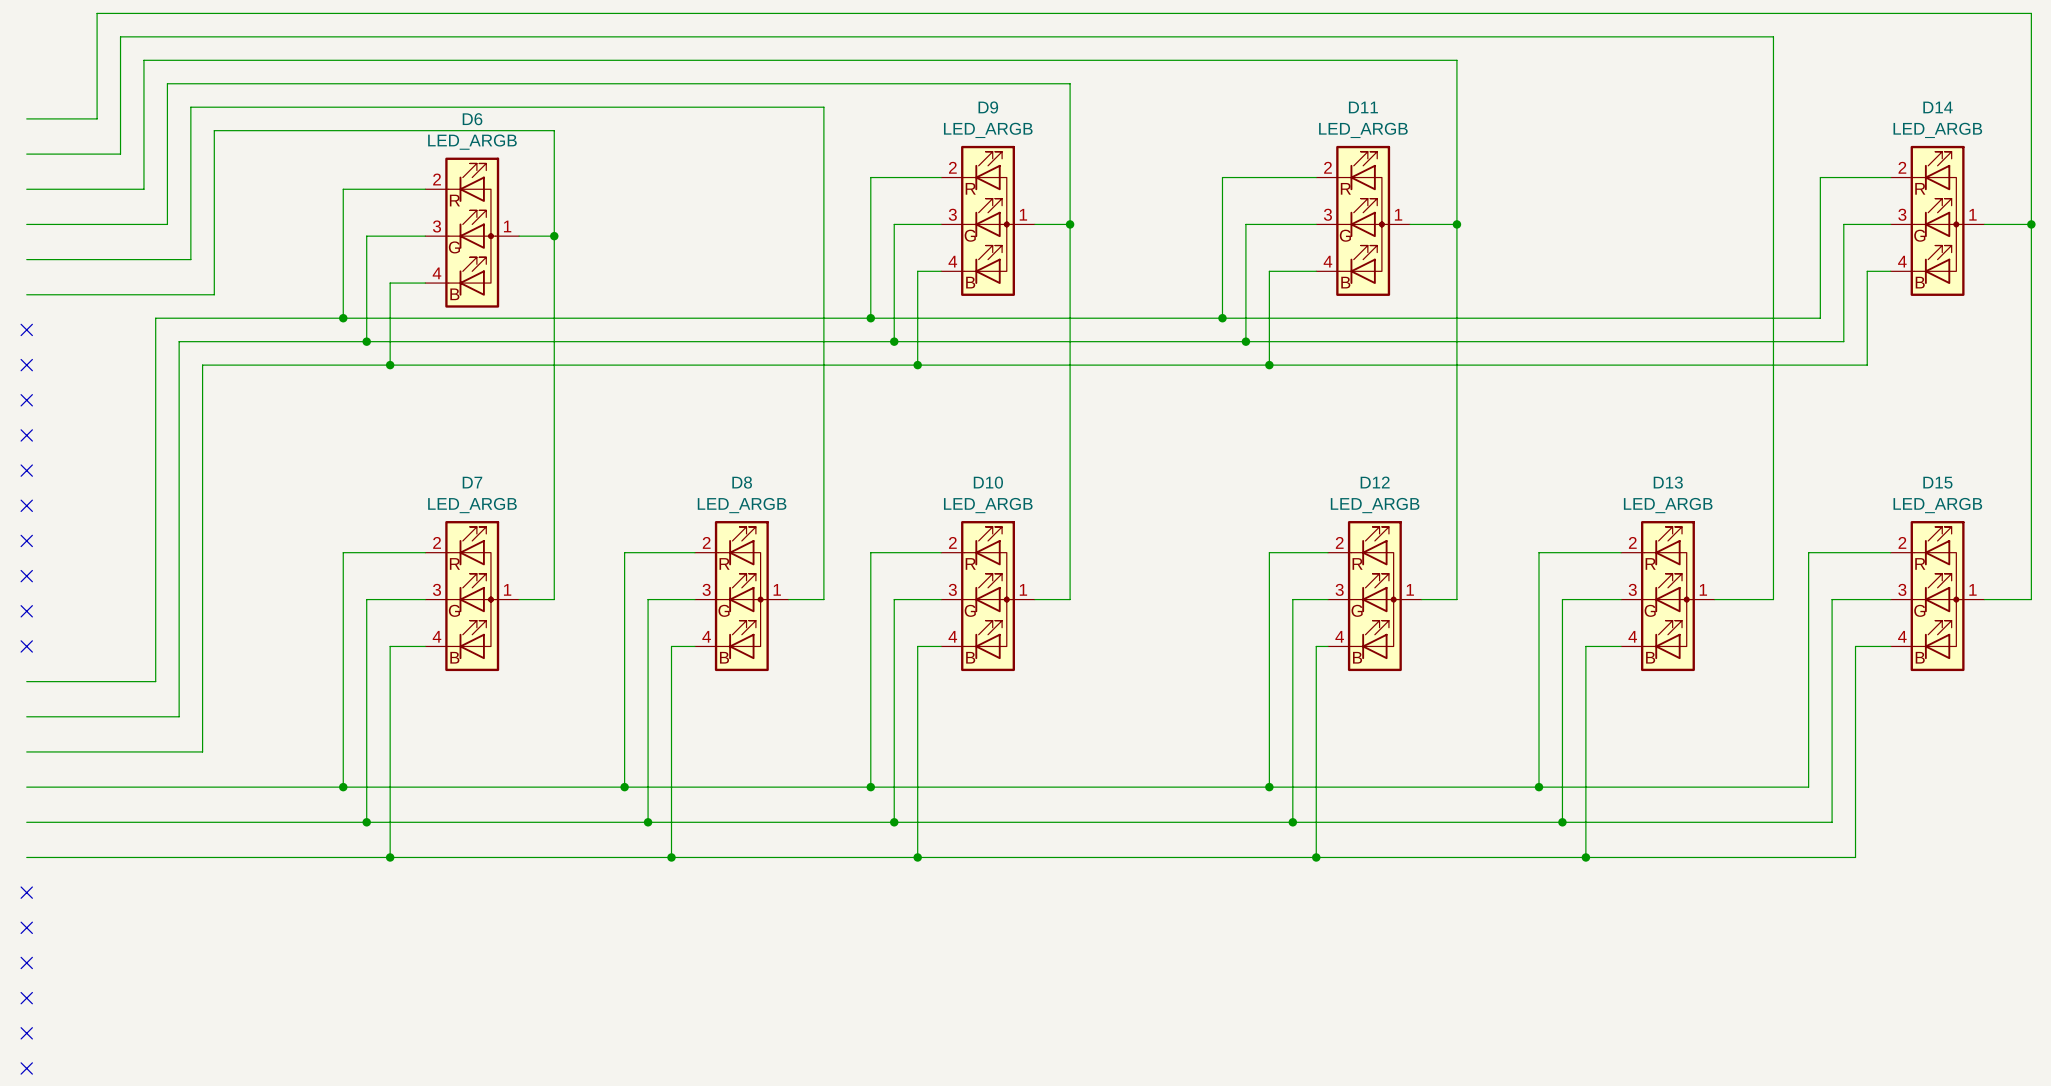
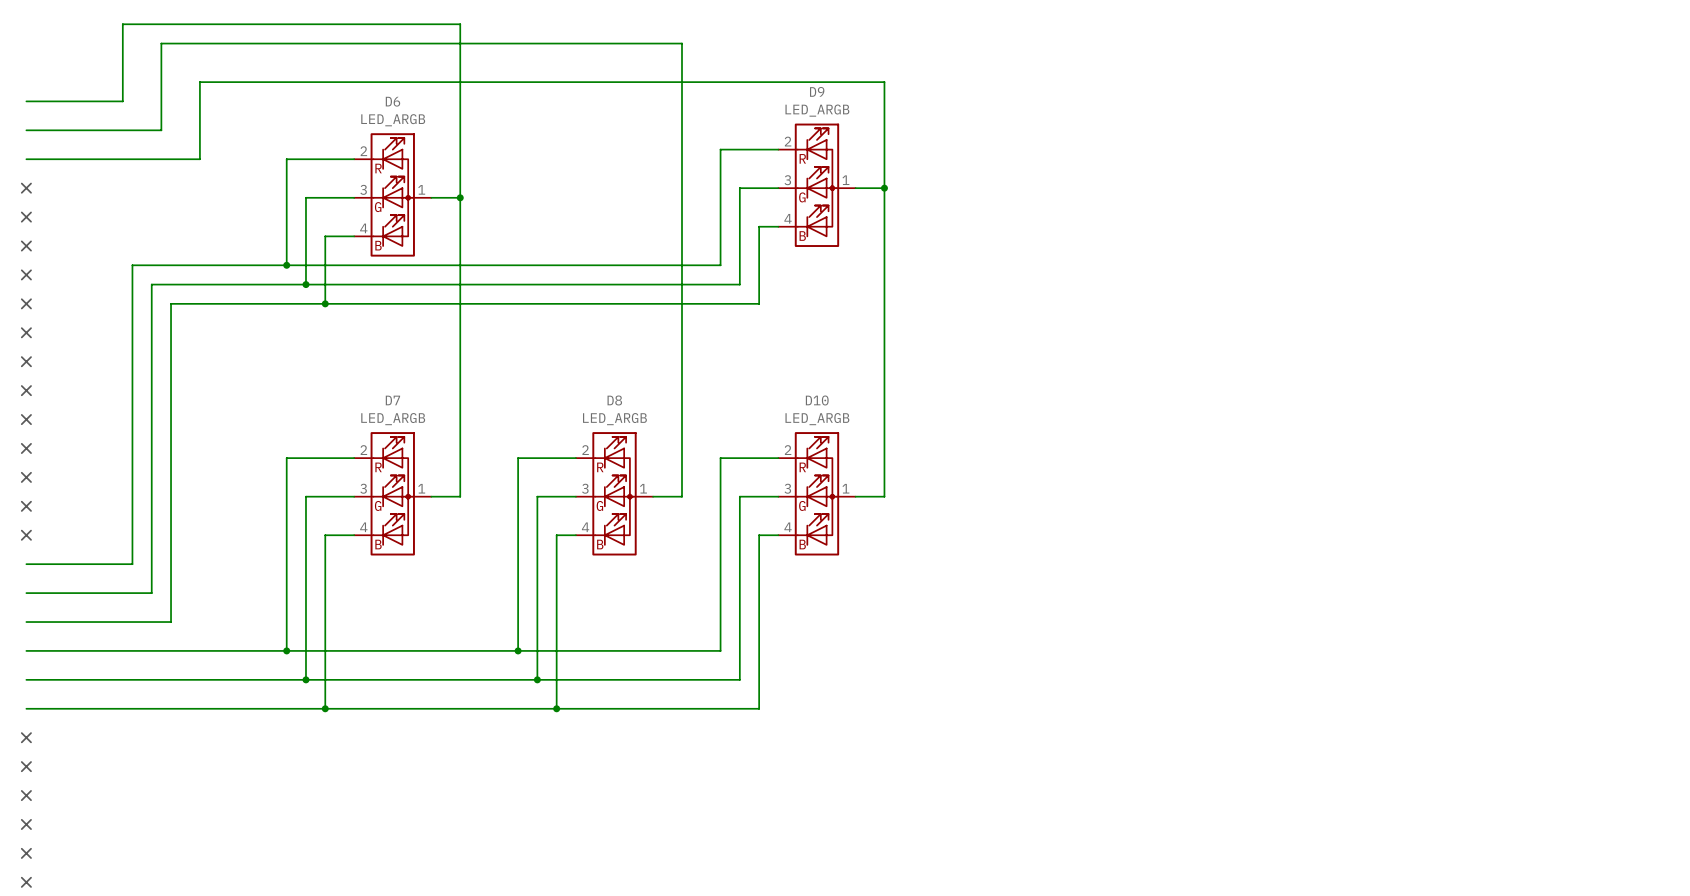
wire: (143, 60) (1456, 60) (1456, 599) (1421, 599) -> none
wire: (1070, 95) (1070, 83) (167, 83) (167, 224) (26, 224) -> (884, 82) (199, 82) (199, 159) (122, 159)
wire: (190, 107) (823, 107) -> (161, 91) (161, 43) (681, 43) (681, 91)
wire: (97, 118) (97, 13) (2031, 13) (2031, 599) (1984, 599) -> none
wire: (143, 118) (143, 189) -> (122, 101) (84, 101)
wire: (554, 130) (214, 130) (214, 294) (26, 294) -> (460, 111) (460, 24) (122, 24) (122, 53)
wire: (120, 154) (120, 36) (1773, 36) (1773, 599) (1714, 599) -> none
wire: (190, 154) (190, 259) (26, 259) -> (161, 130) (103, 130)
wire: (1316, 177) (1222, 177) (1222, 318) -> none
wire: (1890, 177) (1820, 177) (1820, 318) (870, 318) -> none
D11: LED_ARGB (1363, 220) -> none
D14: LED_ARGB (1937, 220) -> none
no-connect mark: none -> (26, 188)
wire: (1316, 224) (1245, 224) (1245, 341) -> none
wire: (1410, 224) (1456, 224) -> none
junction: (1456, 224) -> none
wire: (1890, 224) (1843, 224) (1843, 341) (894, 341) -> none
wire: (1984, 224) (2031, 224) -> none
junction: (2031, 224) -> none
no-connect mark: none -> (26, 217)
wire: (1316, 271) (1269, 271) (1269, 365) -> none
wire: (1890, 271) (1867, 271) (1867, 365) (917, 365) -> none
no-connect mark: none -> (26, 246)
junction: (870, 318) -> none
junction: (1222, 318) -> none
junction: (894, 341) -> none
junction: (1245, 341) -> none
junction: (917, 365) -> none
junction: (1269, 365) -> none
wire: (1327, 552) (1269, 552) (1269, 787) -> none
wire: (1621, 552) (1539, 552) (1539, 787) -> none
wire: (1890, 552) (1808, 552) (1808, 787) (870, 787) -> none
D12: LED_ARGB (1374, 596) -> none
D13: LED_ARGB (1667, 596) -> none
D15: LED_ARGB (1937, 596) -> none
wire: (1327, 599) (1292, 599) (1292, 822) -> none
wire: (1621, 599) (1562, 599) (1562, 822) -> none
wire: (1890, 599) (1832, 599) (1832, 822) (894, 822) -> none
wire: (1327, 646) (1316, 646) (1316, 857) -> none
wire: (1621, 646) (1585, 646) (1585, 857) -> none
wire: (1890, 646) (1855, 646) (1855, 857) (917, 857) -> none
junction: (870, 787) -> none
junction: (1269, 787) -> none
junction: (1539, 787) -> none
junction: (894, 822) -> none
junction: (1292, 822) -> none
junction: (1562, 822) -> none
junction: (917, 857) -> none
junction: (1316, 857) -> none
junction: (1585, 857) -> none

